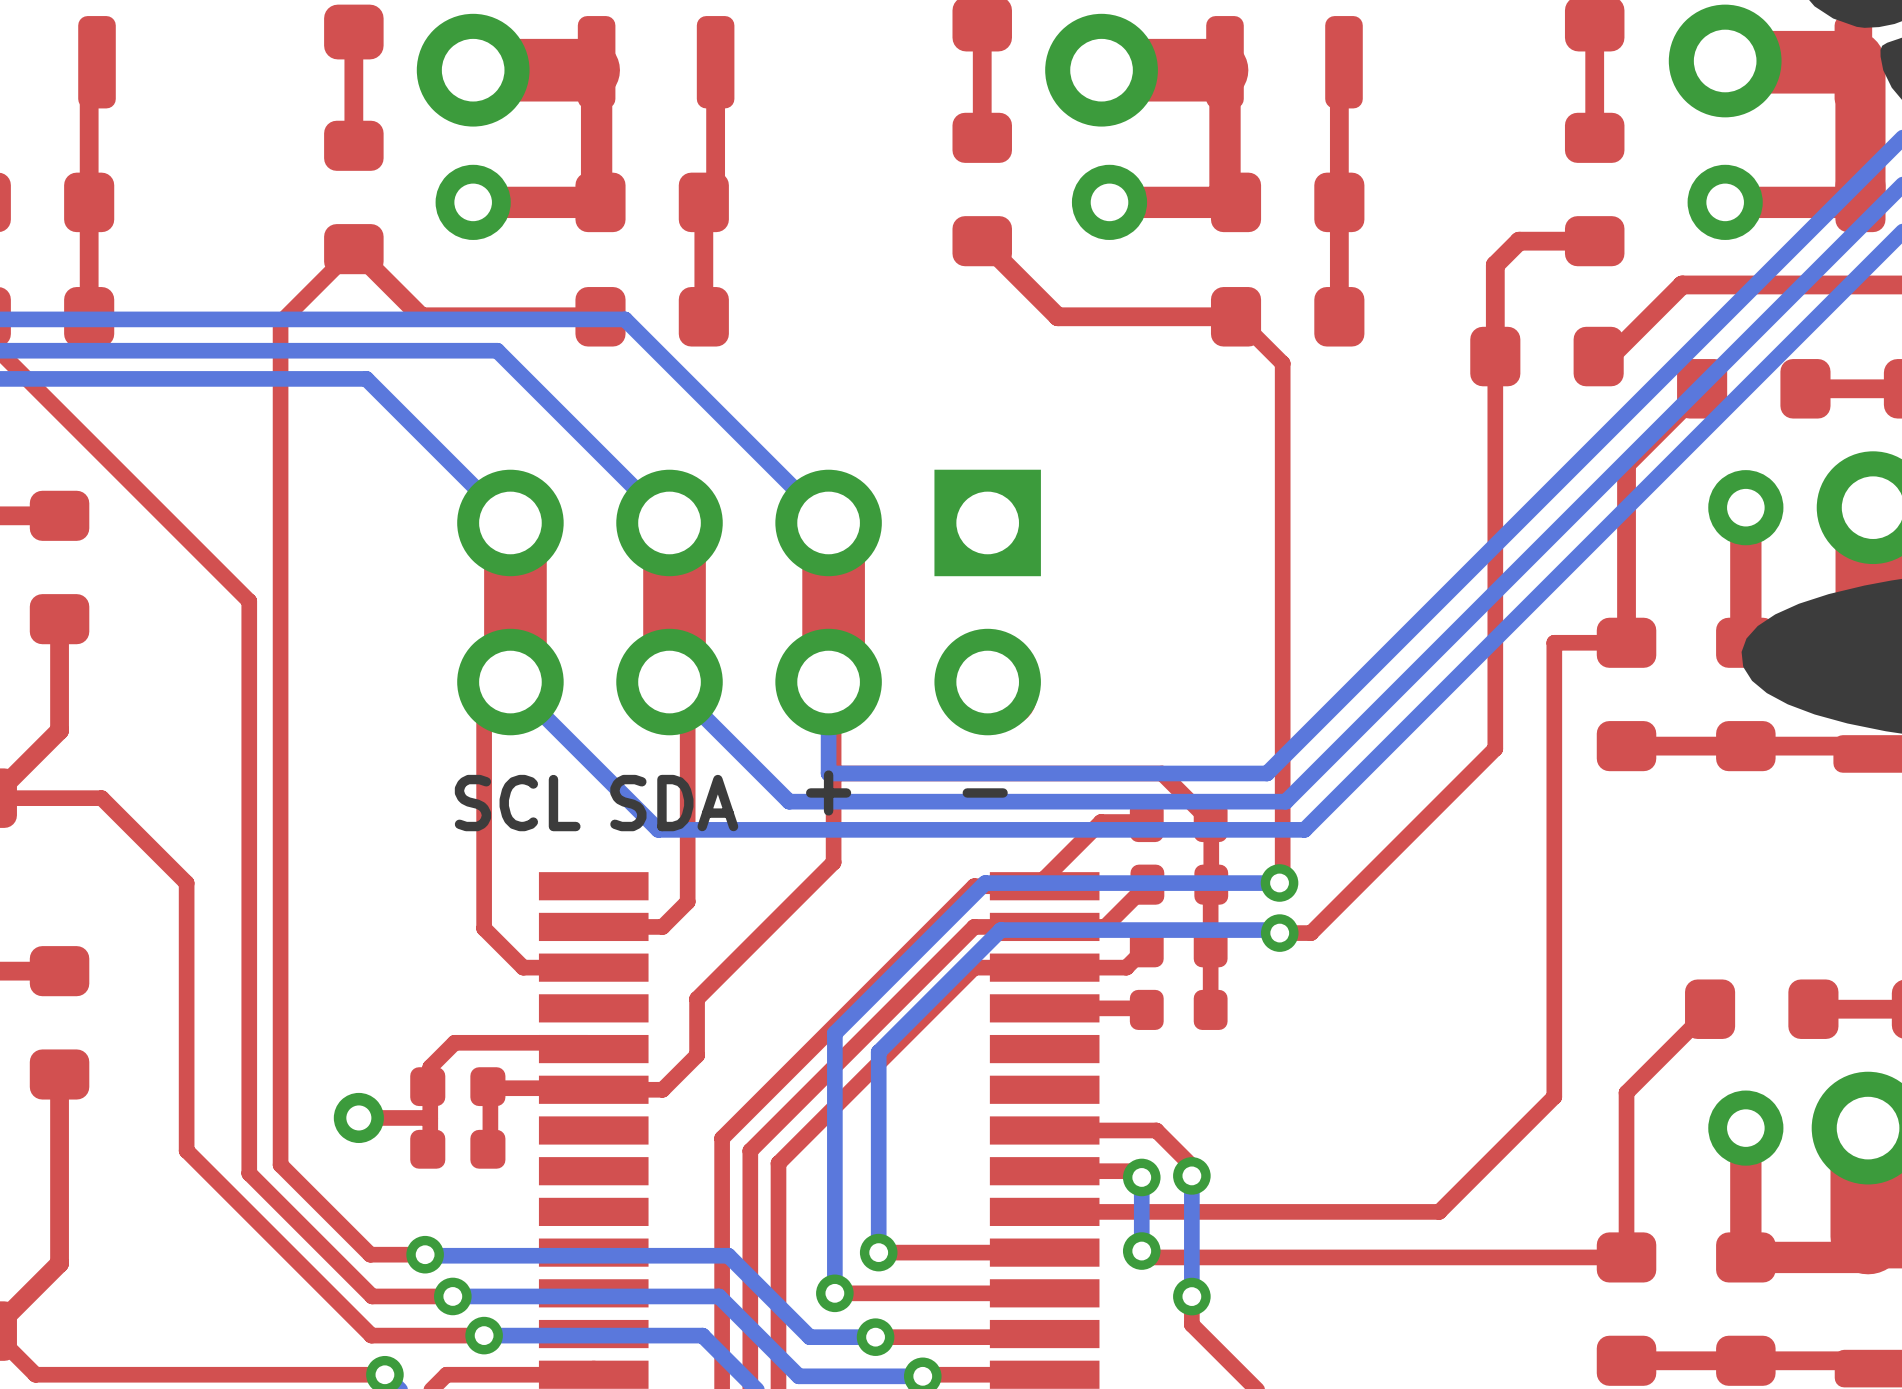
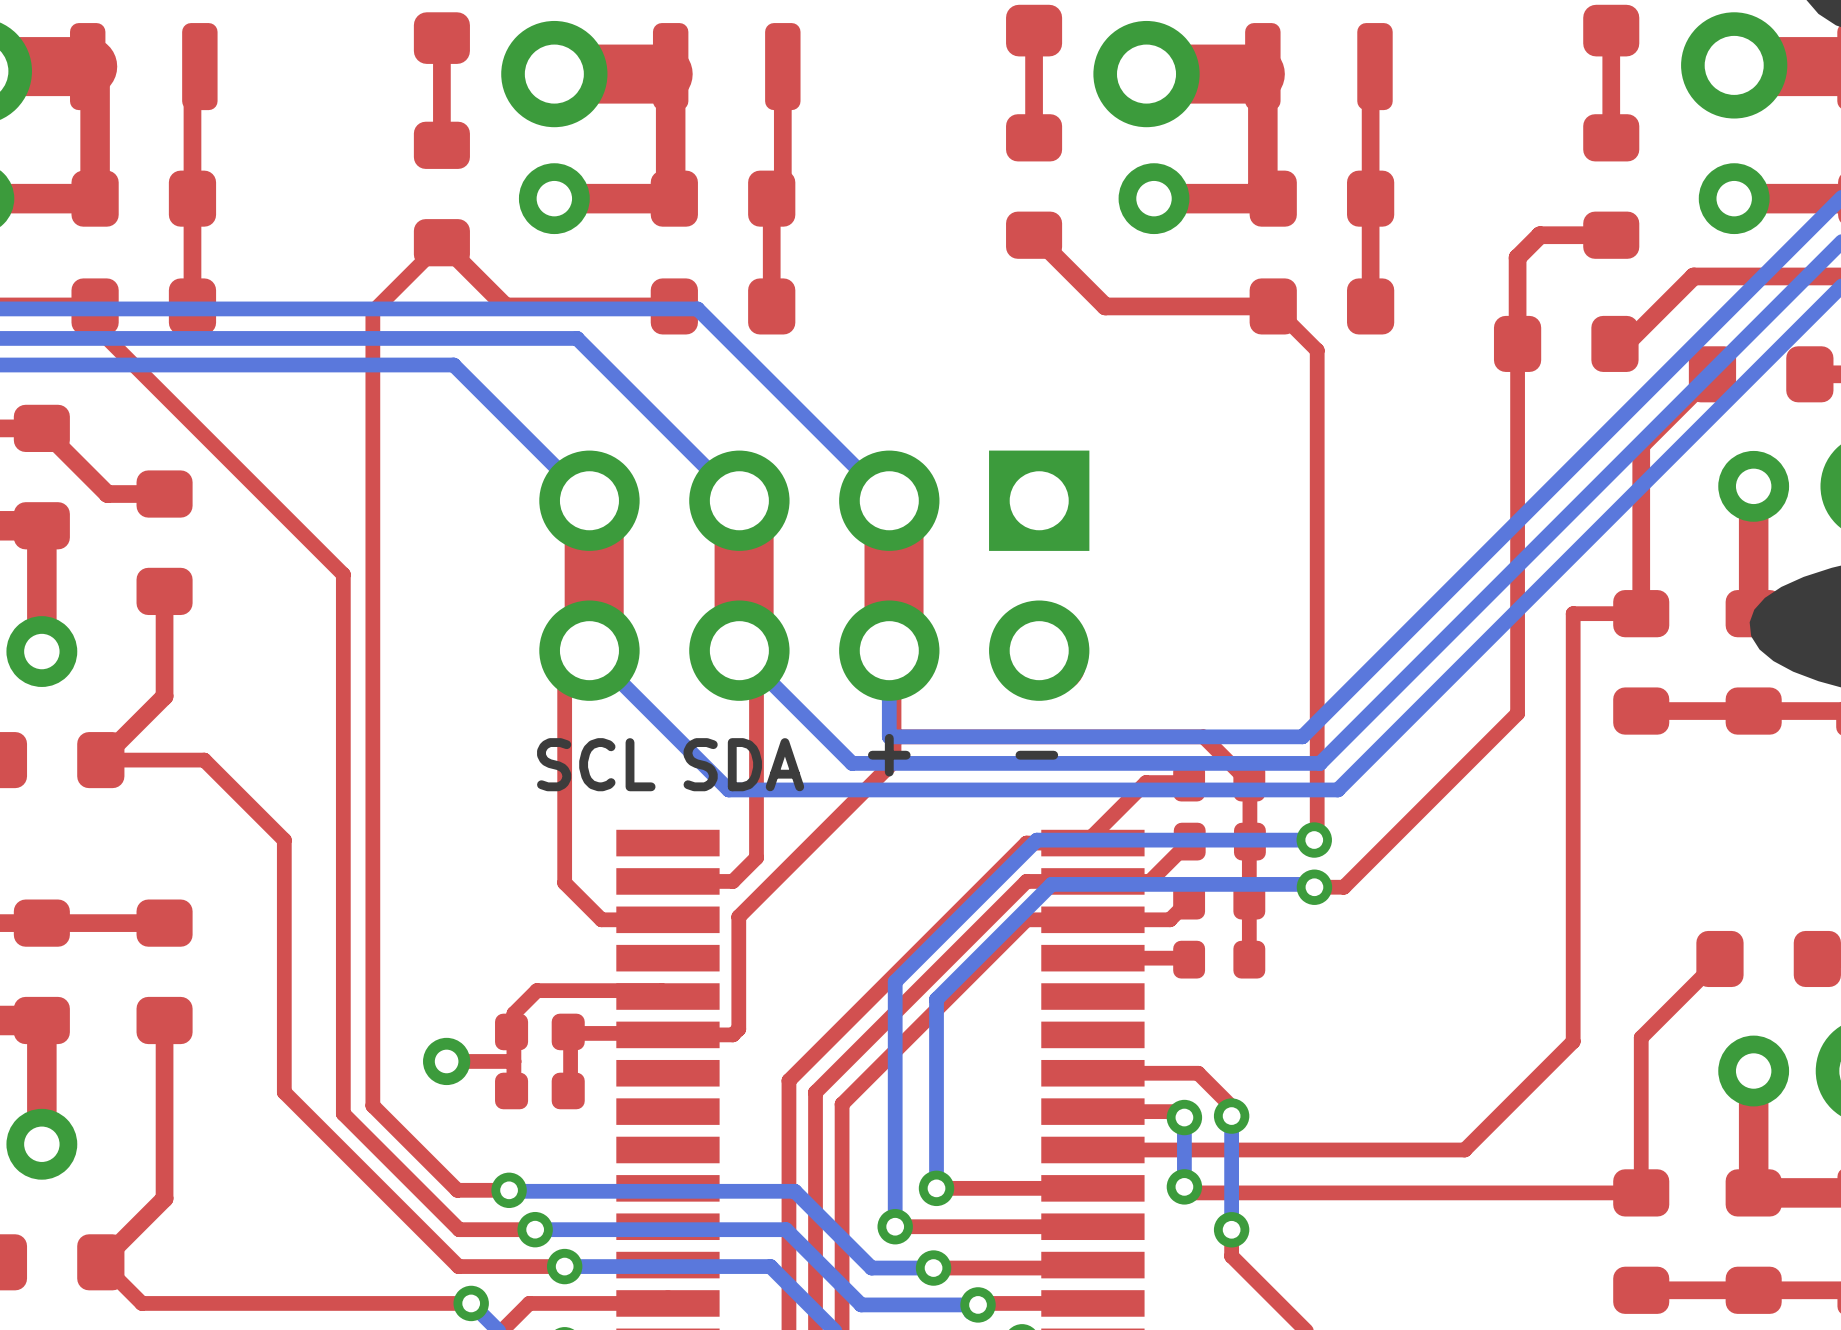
top track: (833, 799) (833, 862) (697, 998) (697, 1055) (668, 1083) -> (894, 761) (738, 916) (738, 1029)

